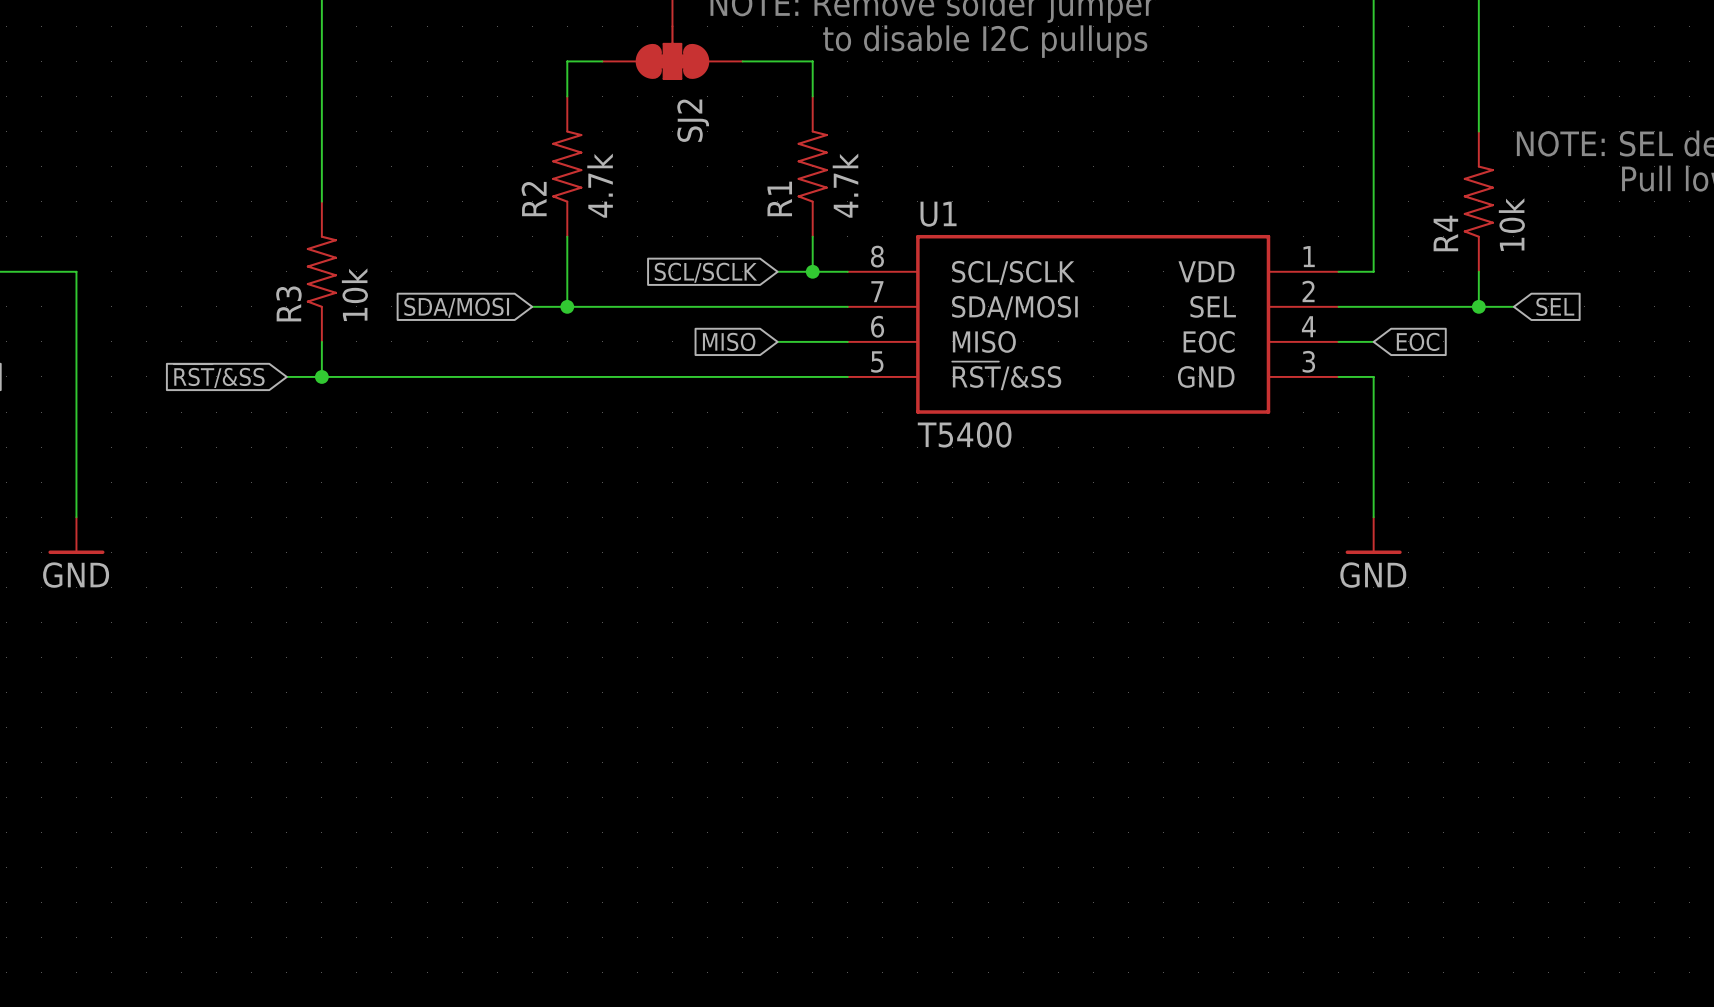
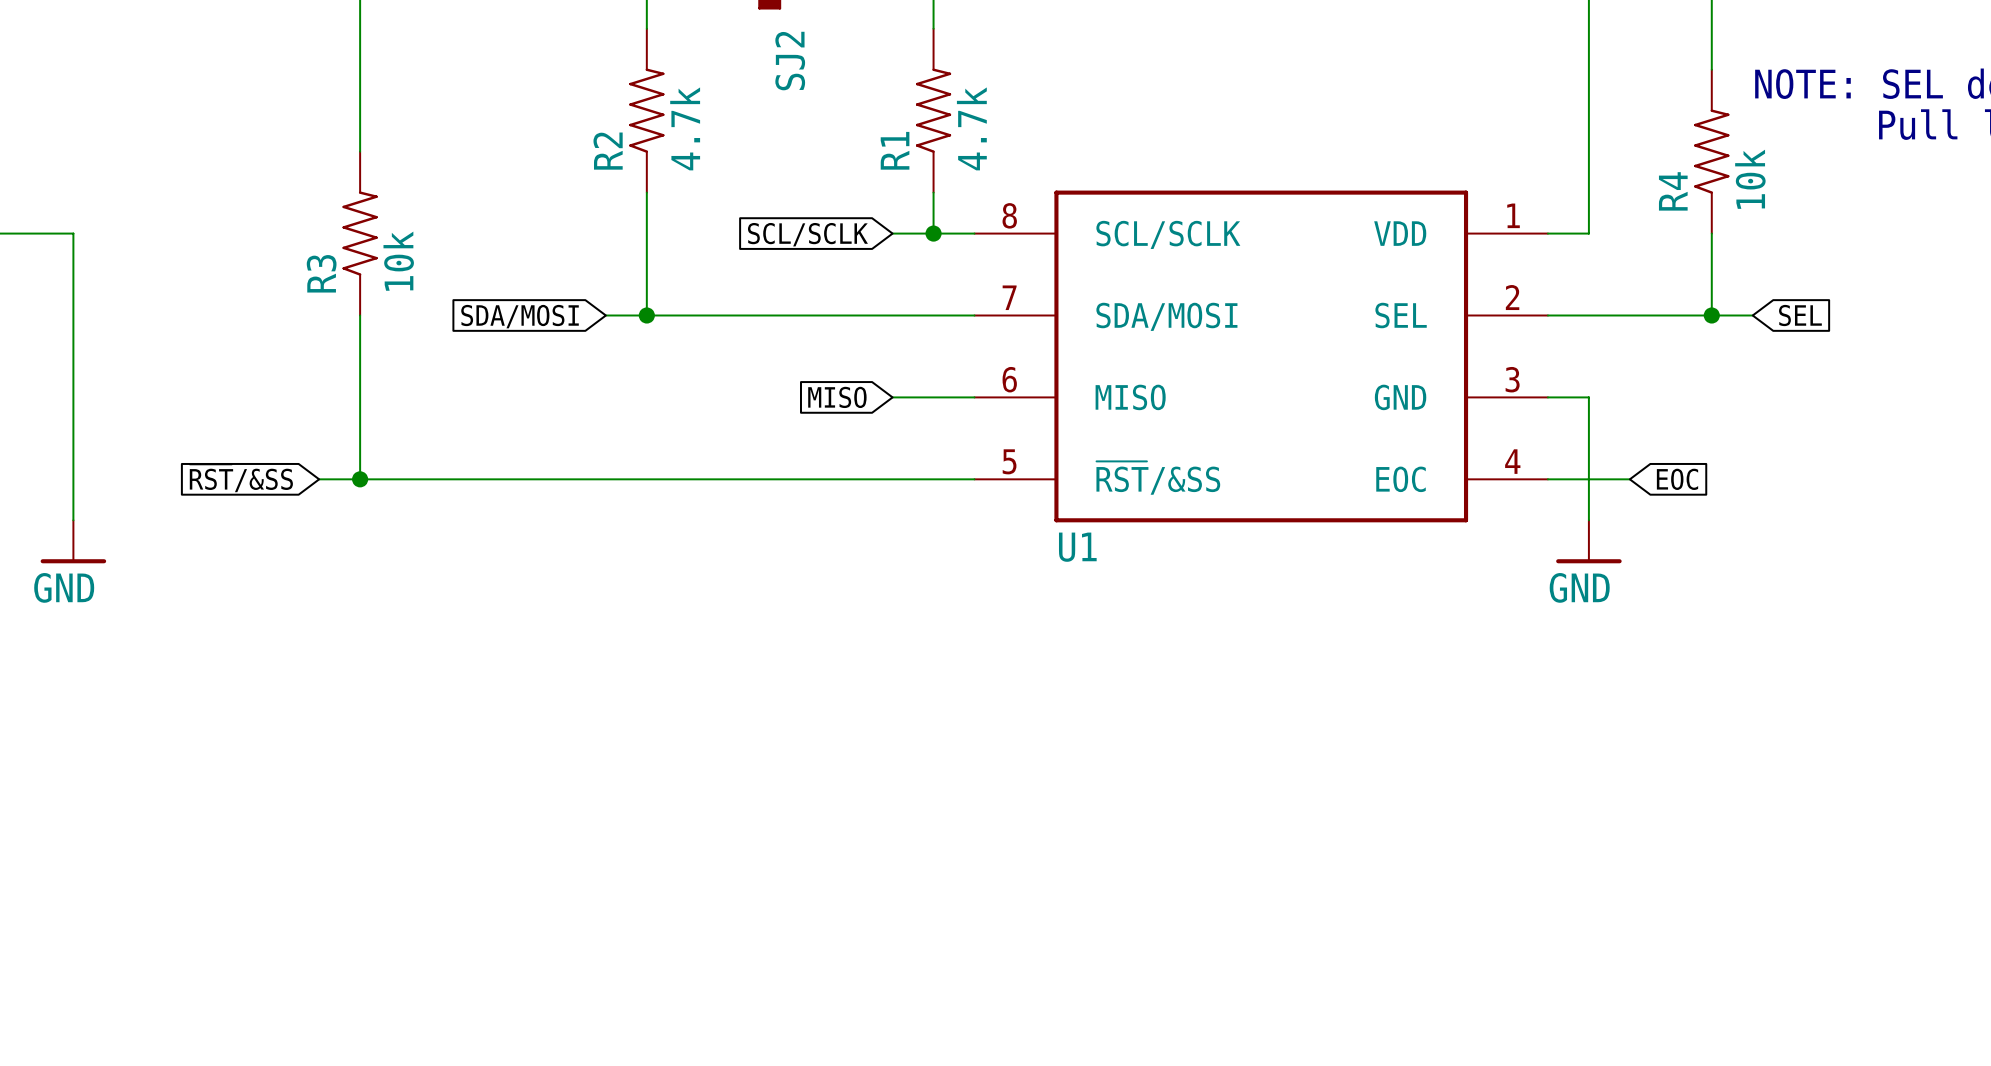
U1 name position: U1 (938, 214) -> U1 (1077, 547)
U1 symbol: [847, 234, 1339, 414] -> [974, 190, 1548, 523]
wire: (532, 306) (847, 306) -> none
wire: none -> (646, 274) (646, 315)
junction position: (567, 306) -> (646, 315)
wire: (1338, 306) (1513, 306) -> none
wire: none -> (1711, 274) (1711, 315)
junction position: (1478, 306) -> (1711, 315)
global label position: SEL (1555, 306) -> SEL (1800, 315)
global label position: SDA/MOSI (456, 307) -> SDA/MOSI (520, 316)
wire: none -> (605, 315) (892, 315)
global label position: MISO (729, 341) -> MISO (837, 397)
wire: none -> (1588, 315) (1752, 315)
global label position: EOC (1418, 341) -> EOC (1677, 479)
global label position: ~{RST}/&SS (219, 376) -> ~{RST}/&SS (241, 478)
wire: (286, 376) (847, 376) -> (319, 479) (974, 479)
wire: none -> (360, 356) (360, 479)
junction: (321, 376) -> none
wire: (1338, 376) (1373, 376) (1373, 412) -> (1547, 397) (1588, 397)
wire: none -> (892, 397) (974, 397)
U1 value: T5400 (964, 434) -> none
junction: none -> (360, 479)
wire: none -> (1547, 479) (1629, 479)

